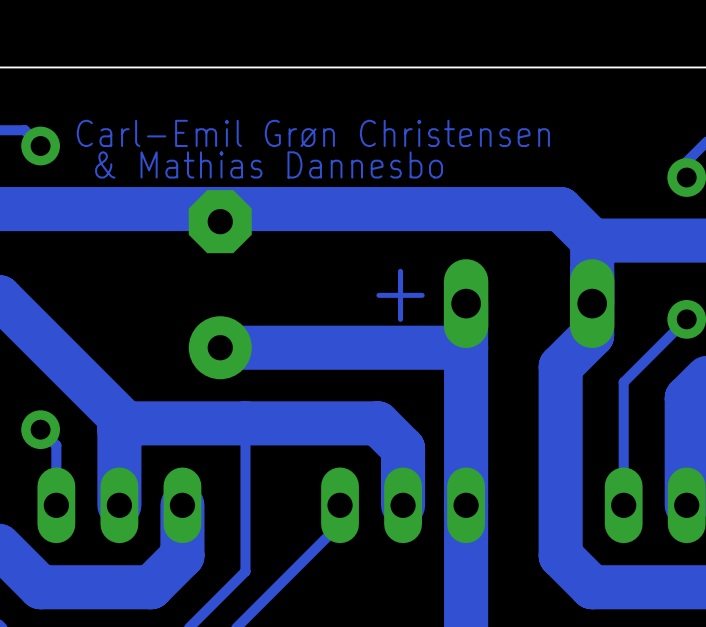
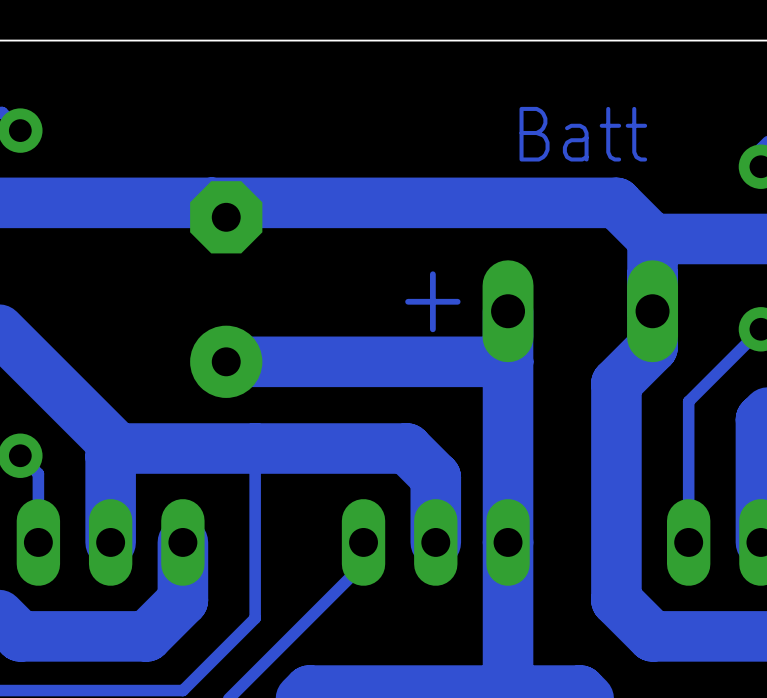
text: Carl-Emil Grøn Christensen (313, 133) -> none
text: none -> Batt (583, 134)
text: & Mathias Dannesbo (269, 164) -> none

